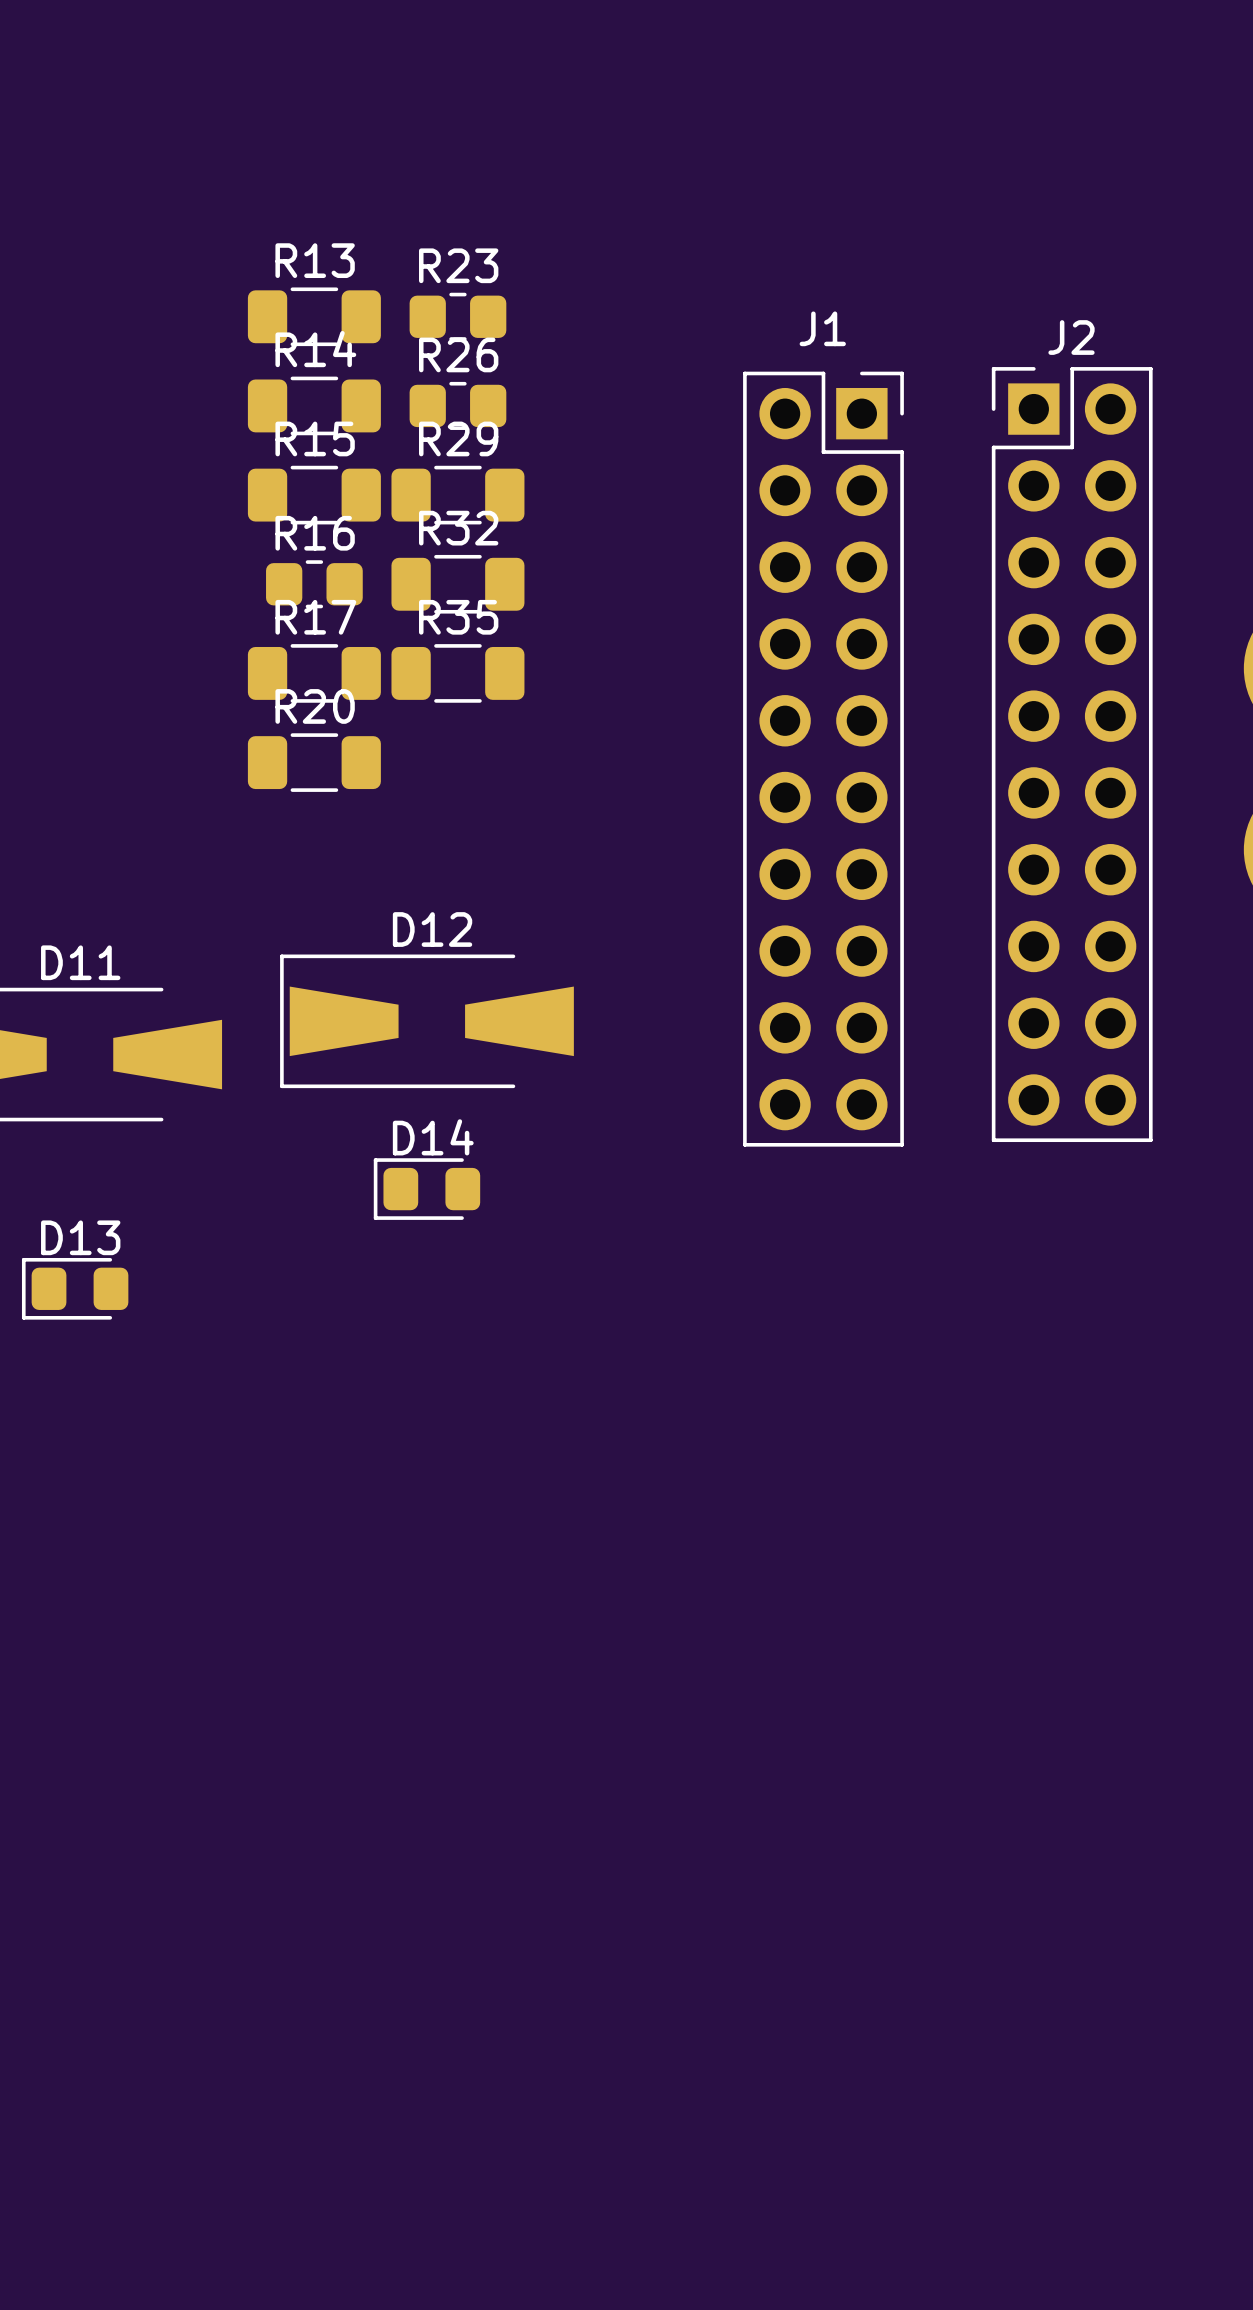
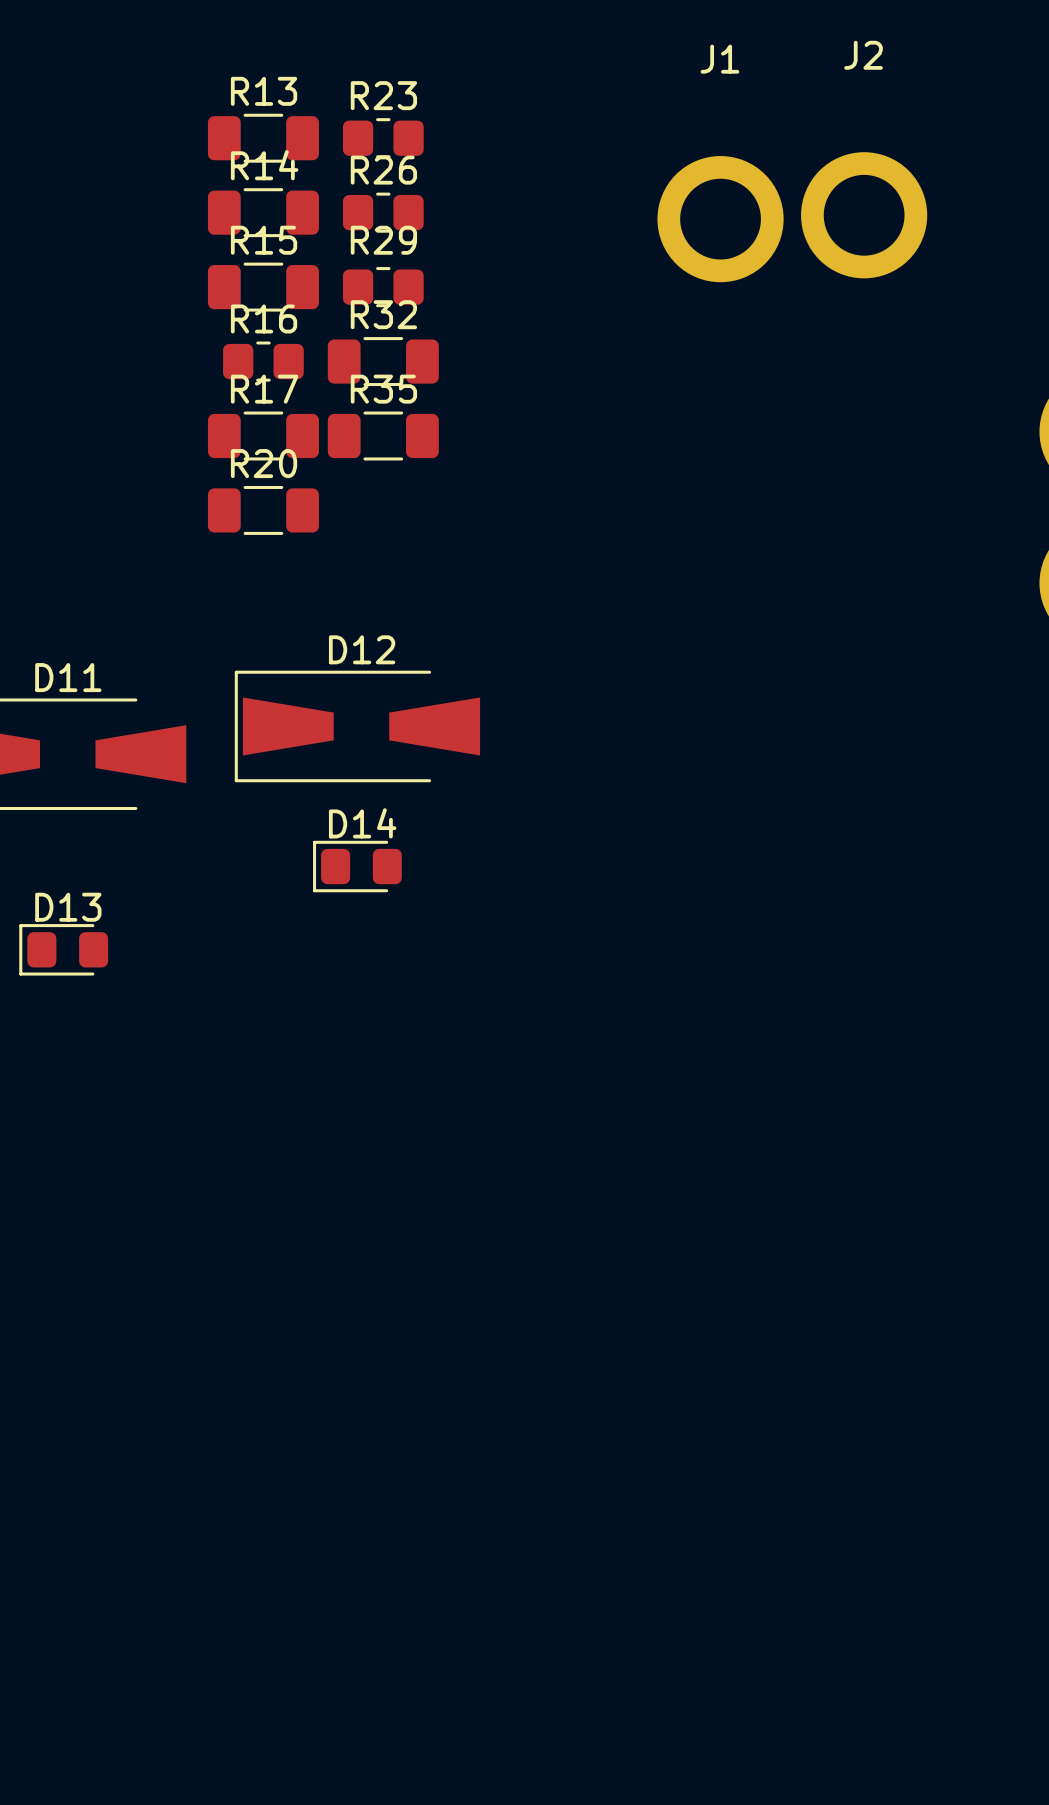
J1 name position: J1 (822, 328) -> J1 (719, 59)
J2 name position: J2 (1071, 337) -> J2 (863, 55)
J2 footprint: [991, 367, 1153, 1143] -> [801, 152, 928, 279]
J1 footprint: [743, 371, 904, 1147] -> [657, 156, 784, 283]
R29 footprint: [391, 465, 525, 525] -> [342, 267, 424, 308]

